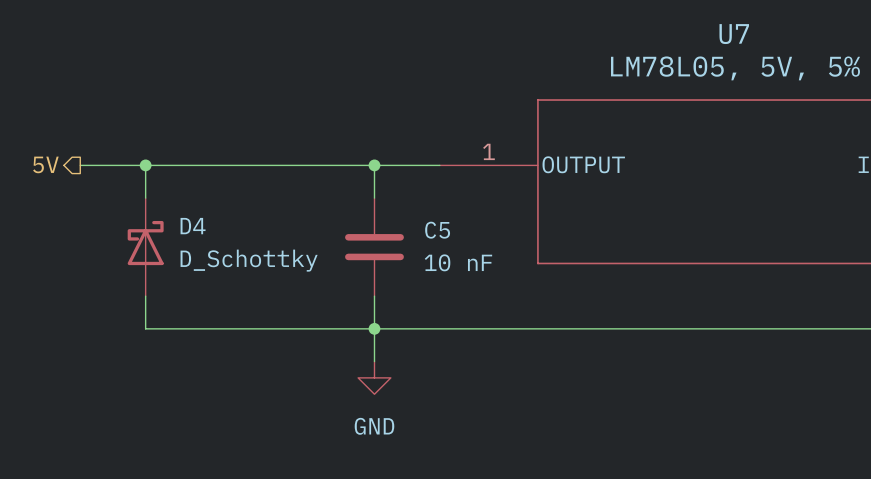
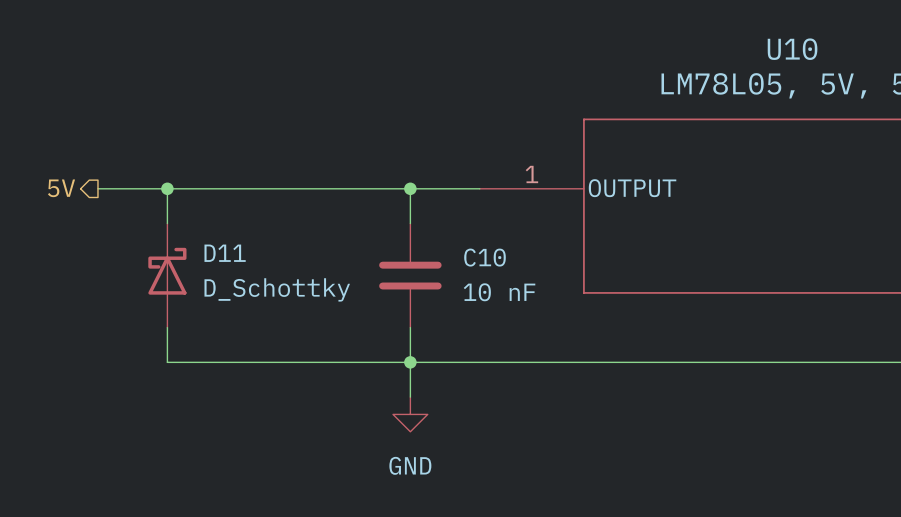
U7 name: U7 (734, 34) -> U10 (792, 49)
D4 name: D4 (193, 226) -> D11 (225, 253)
C5 name: C5 (437, 230) -> C10 (485, 257)

